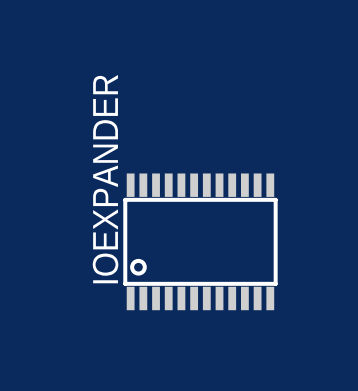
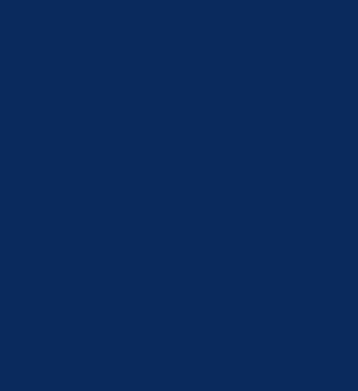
IOEXPANDER: (200, 241) -> none

